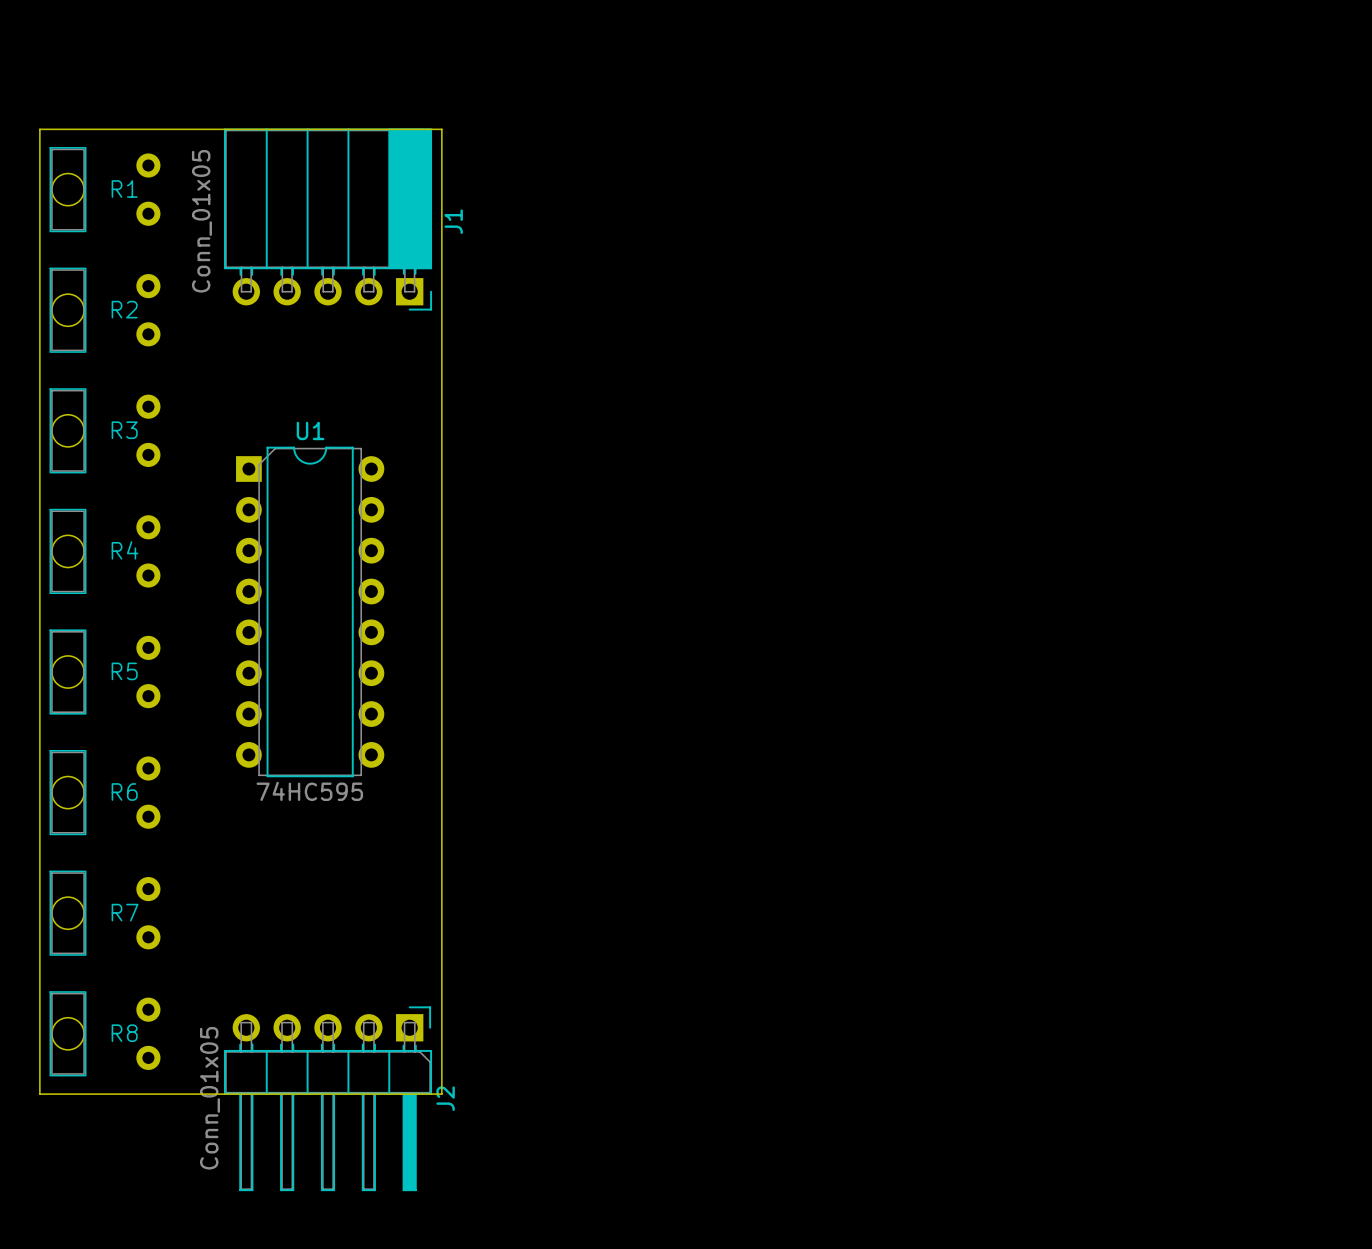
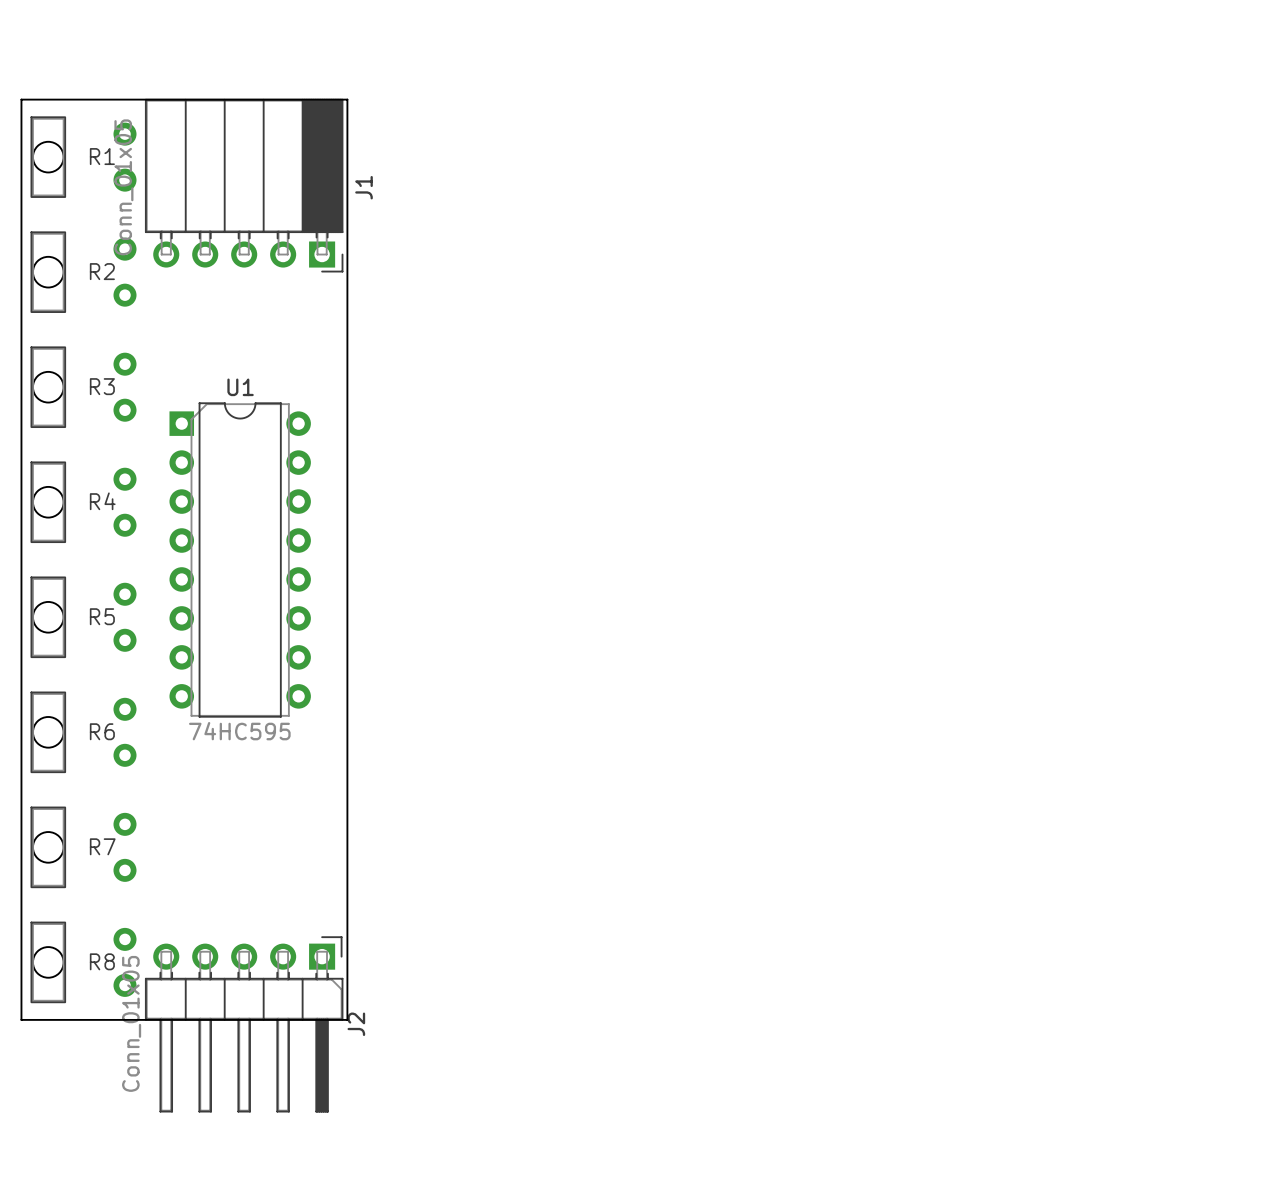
board edge: (381, 129) (441, 129) (441, 1094) (381, 1094) -> (347, 99) (347, 1019)
J1 position: (328, 219) -> (244, 185)
U1 position: (310, 611) -> (240, 559)
J2 position: (328, 1098) -> (244, 1024)

